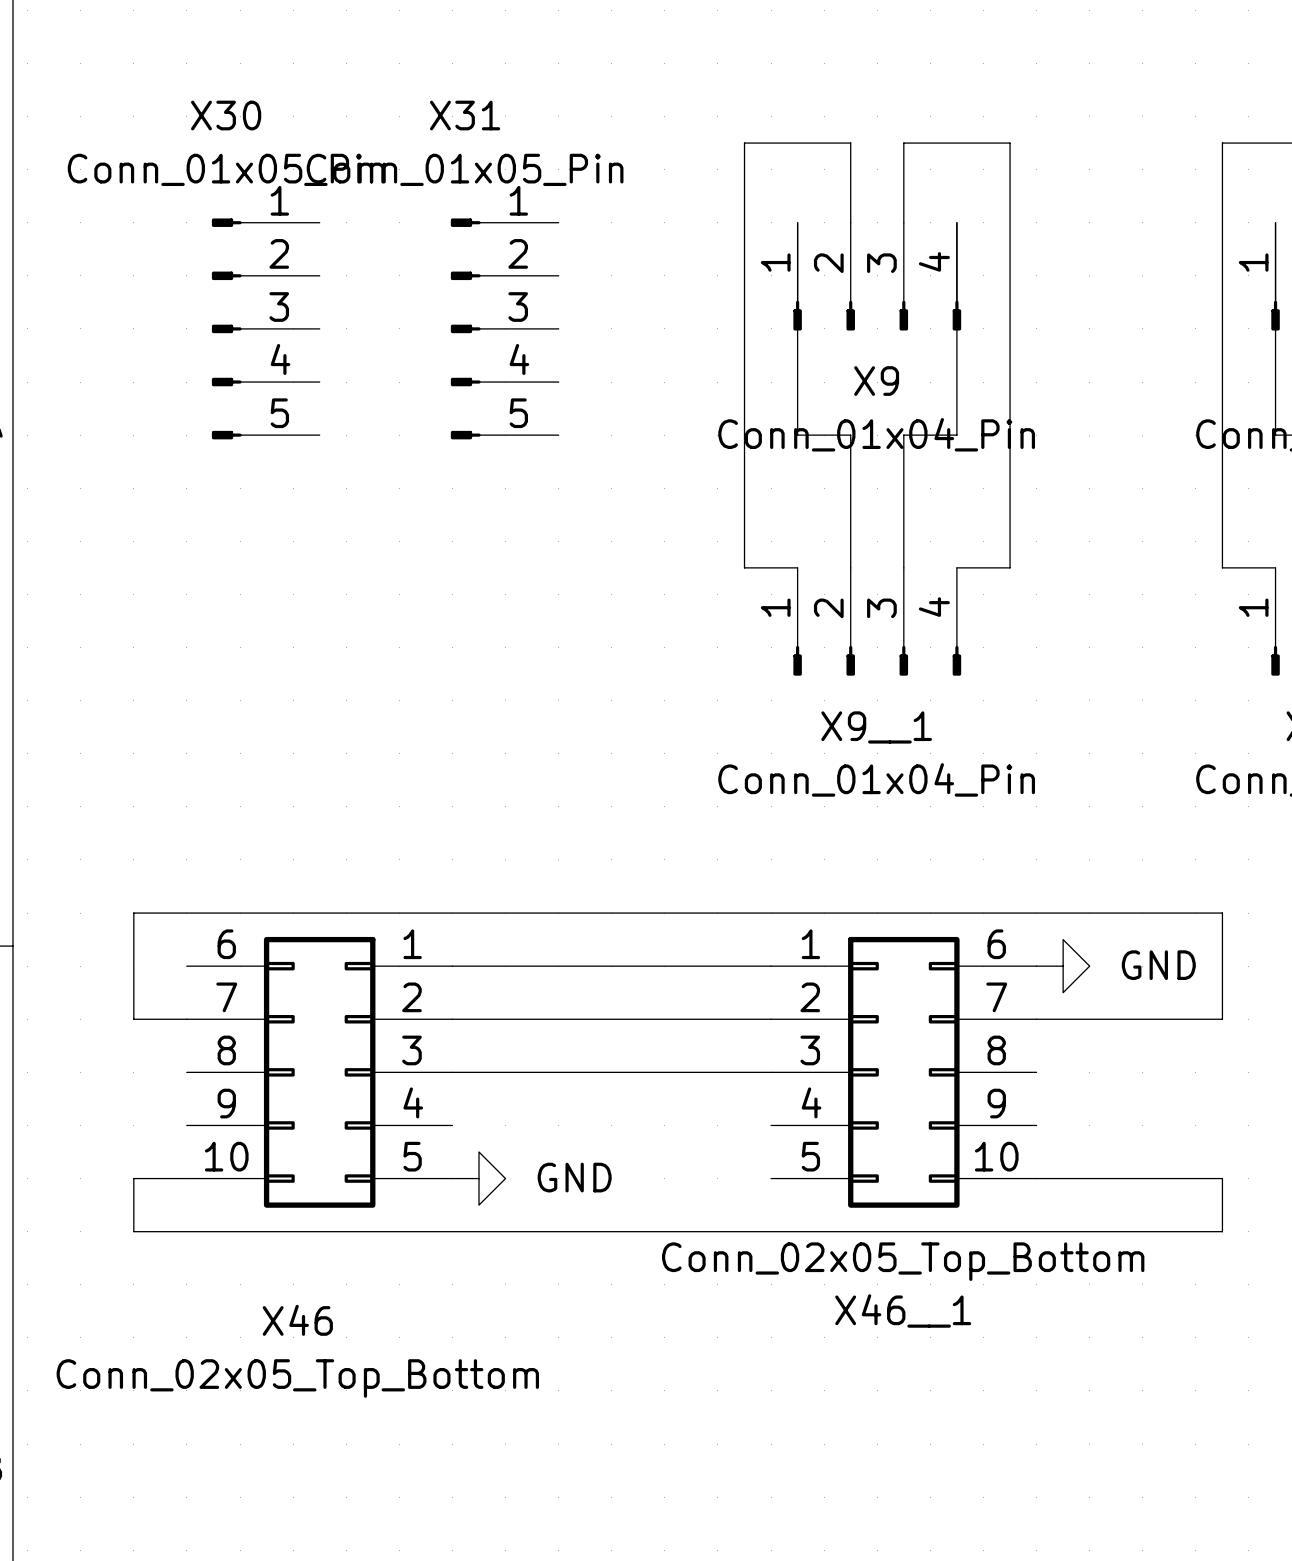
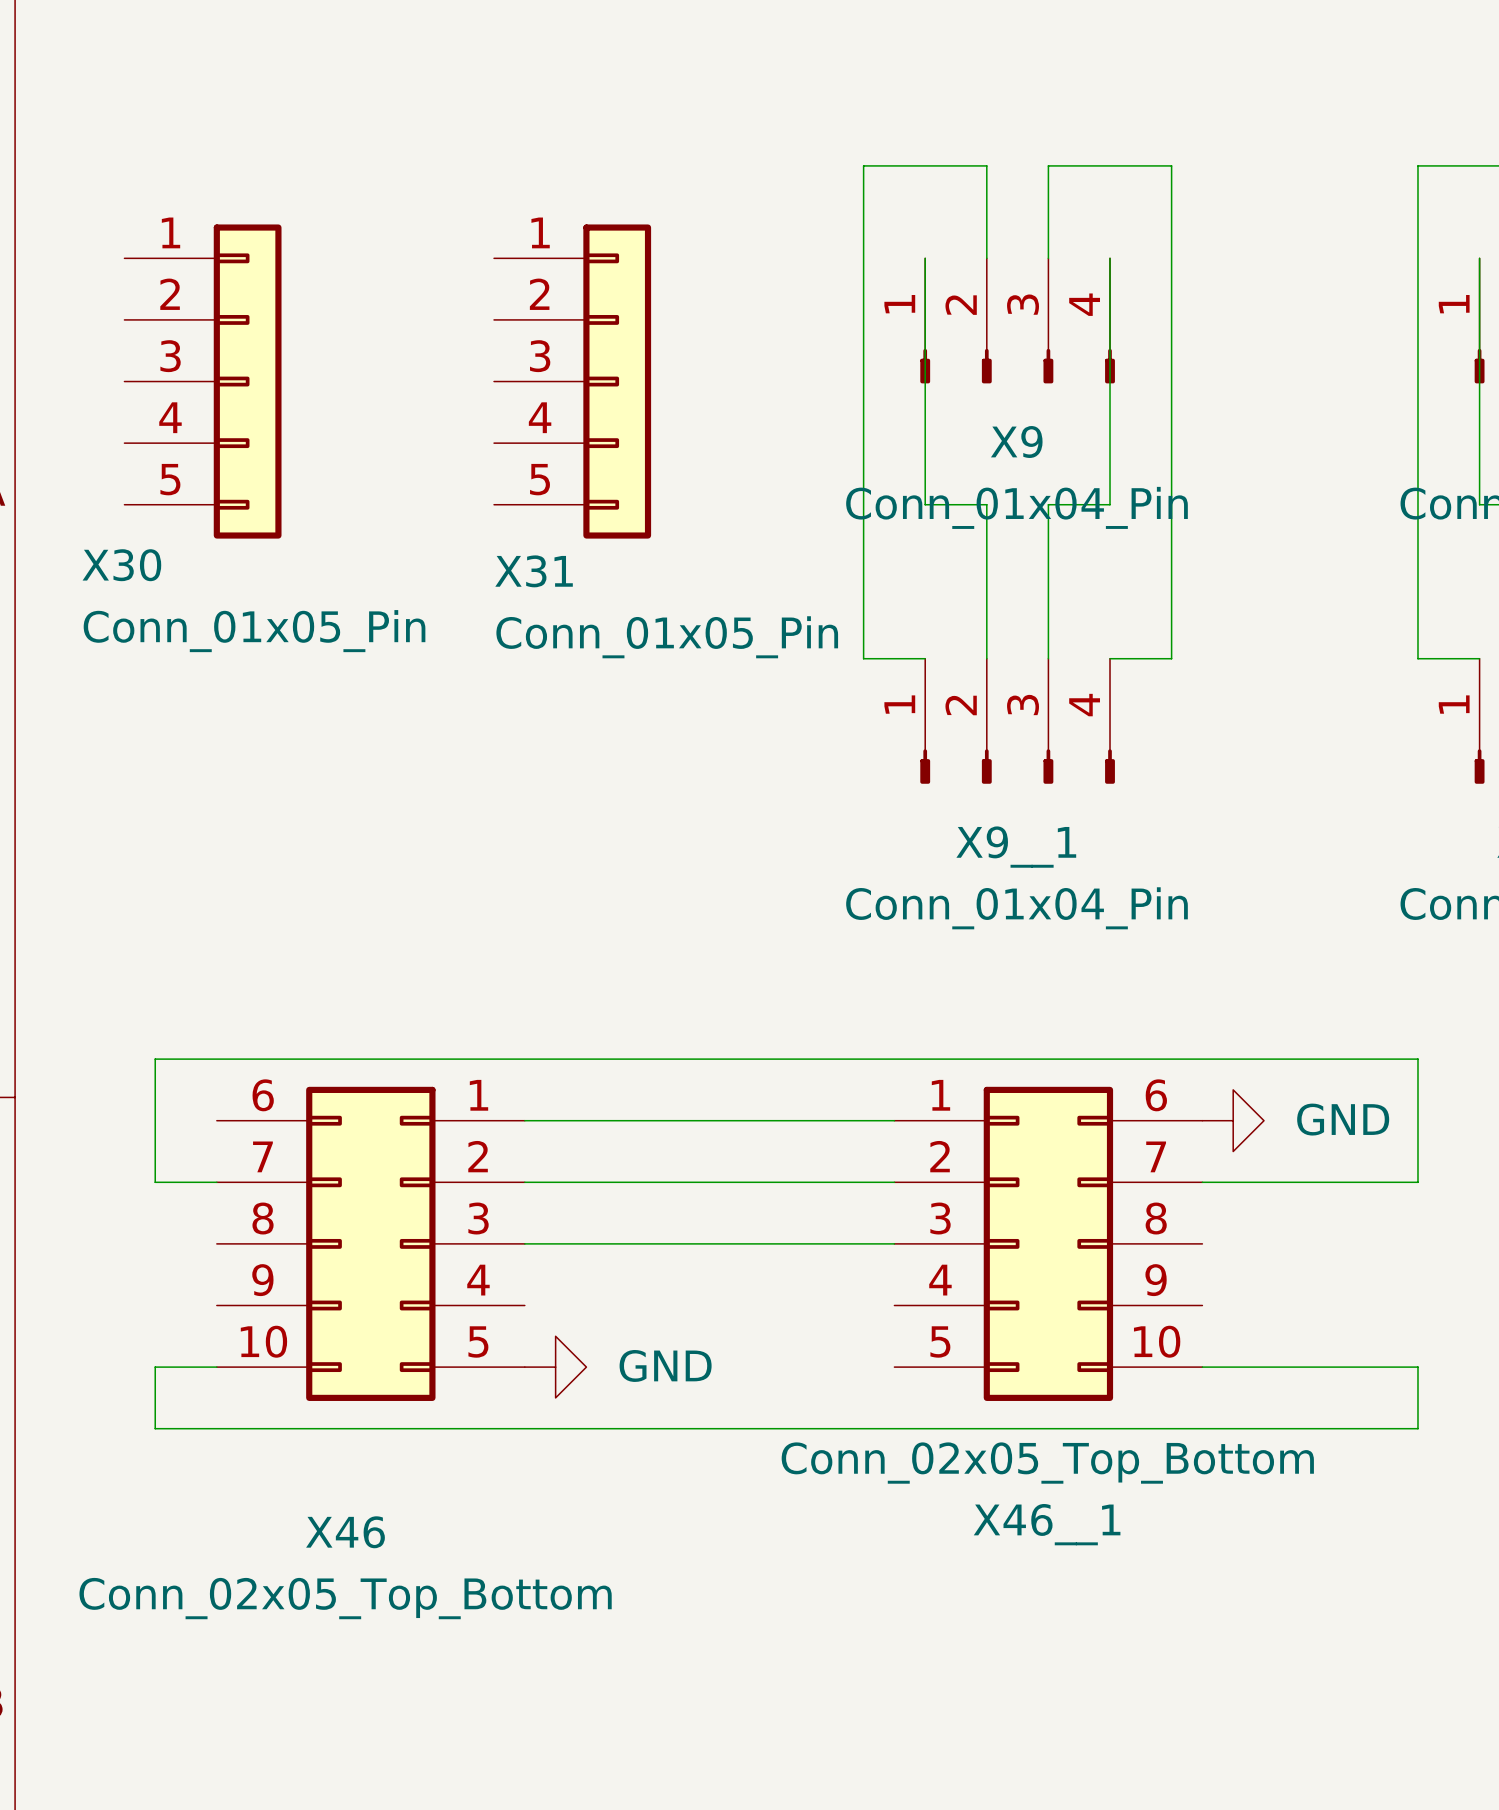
X30 name position: X30 (226, 115) -> X30 (121, 565)
X31 name position: X31 (465, 115) -> X31 (534, 571)
X30 value position: Conn_01x05_Pin (226, 169) -> Conn_01x05_Pin (254, 631)
X31 value position: Conn_01x05_Pin (465, 169) -> Conn_01x05_Pin (667, 637)
X30 symbol: [211, 218, 320, 440] -> [124, 224, 282, 539]
X31 symbol: [450, 218, 559, 440] -> [494, 224, 652, 539]

